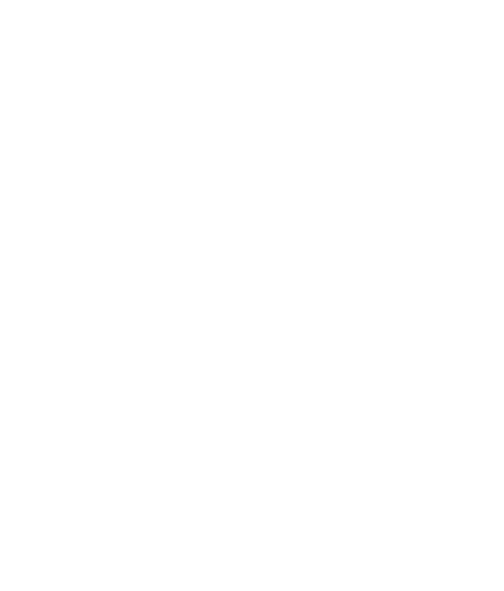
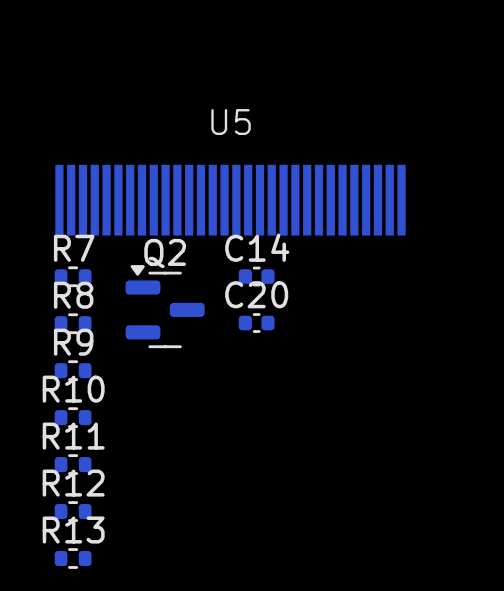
U5: none -> (230, 200)
R7: none -> (73, 276)
C14: none -> (256, 276)
Q2: none -> (165, 306)
R8: none -> (73, 323)
C20: none -> (256, 323)
R9: none -> (73, 370)
R10: none -> (73, 417)
R11: none -> (73, 464)
R12: none -> (73, 511)
R13: none -> (73, 558)

